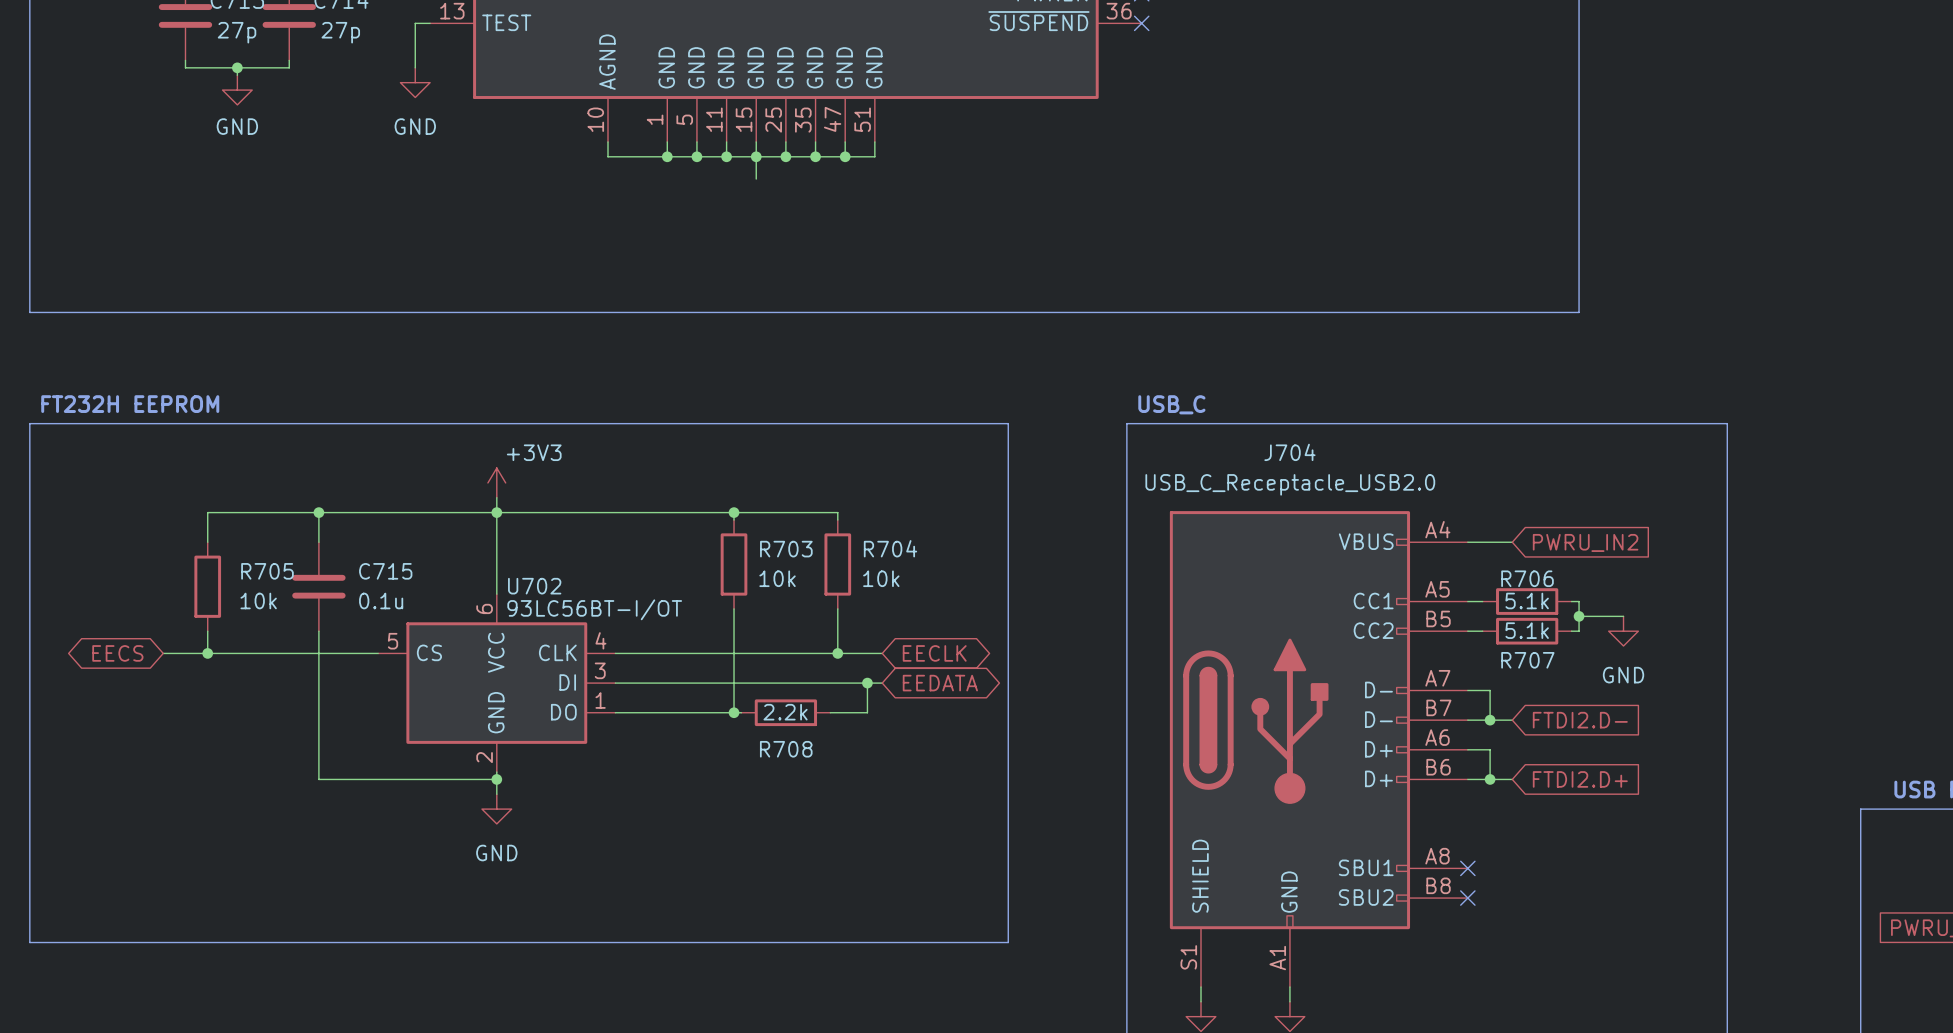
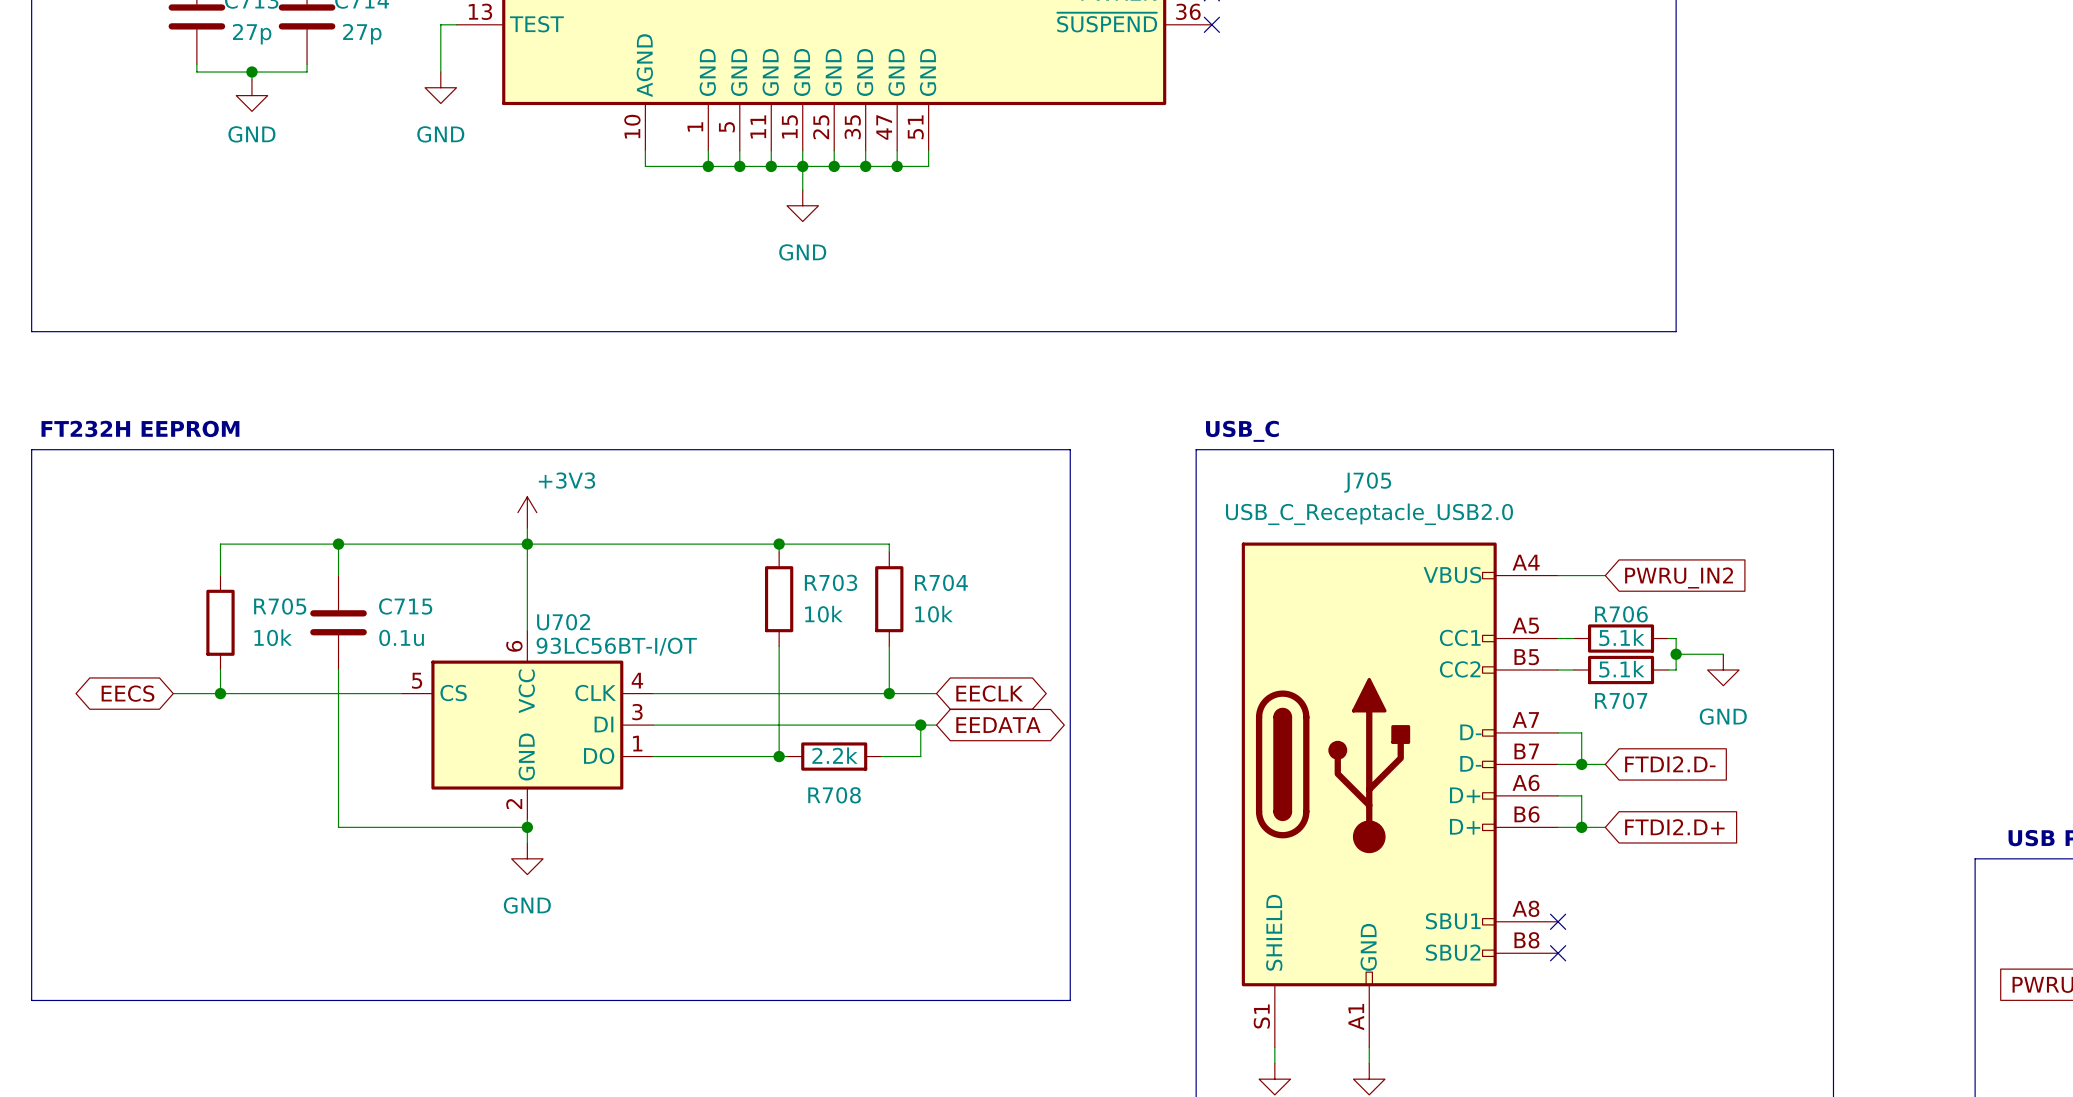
power symbol: none -> GND (802, 205)
J704 name: J704 (1289, 452) -> J705 (1367, 482)

